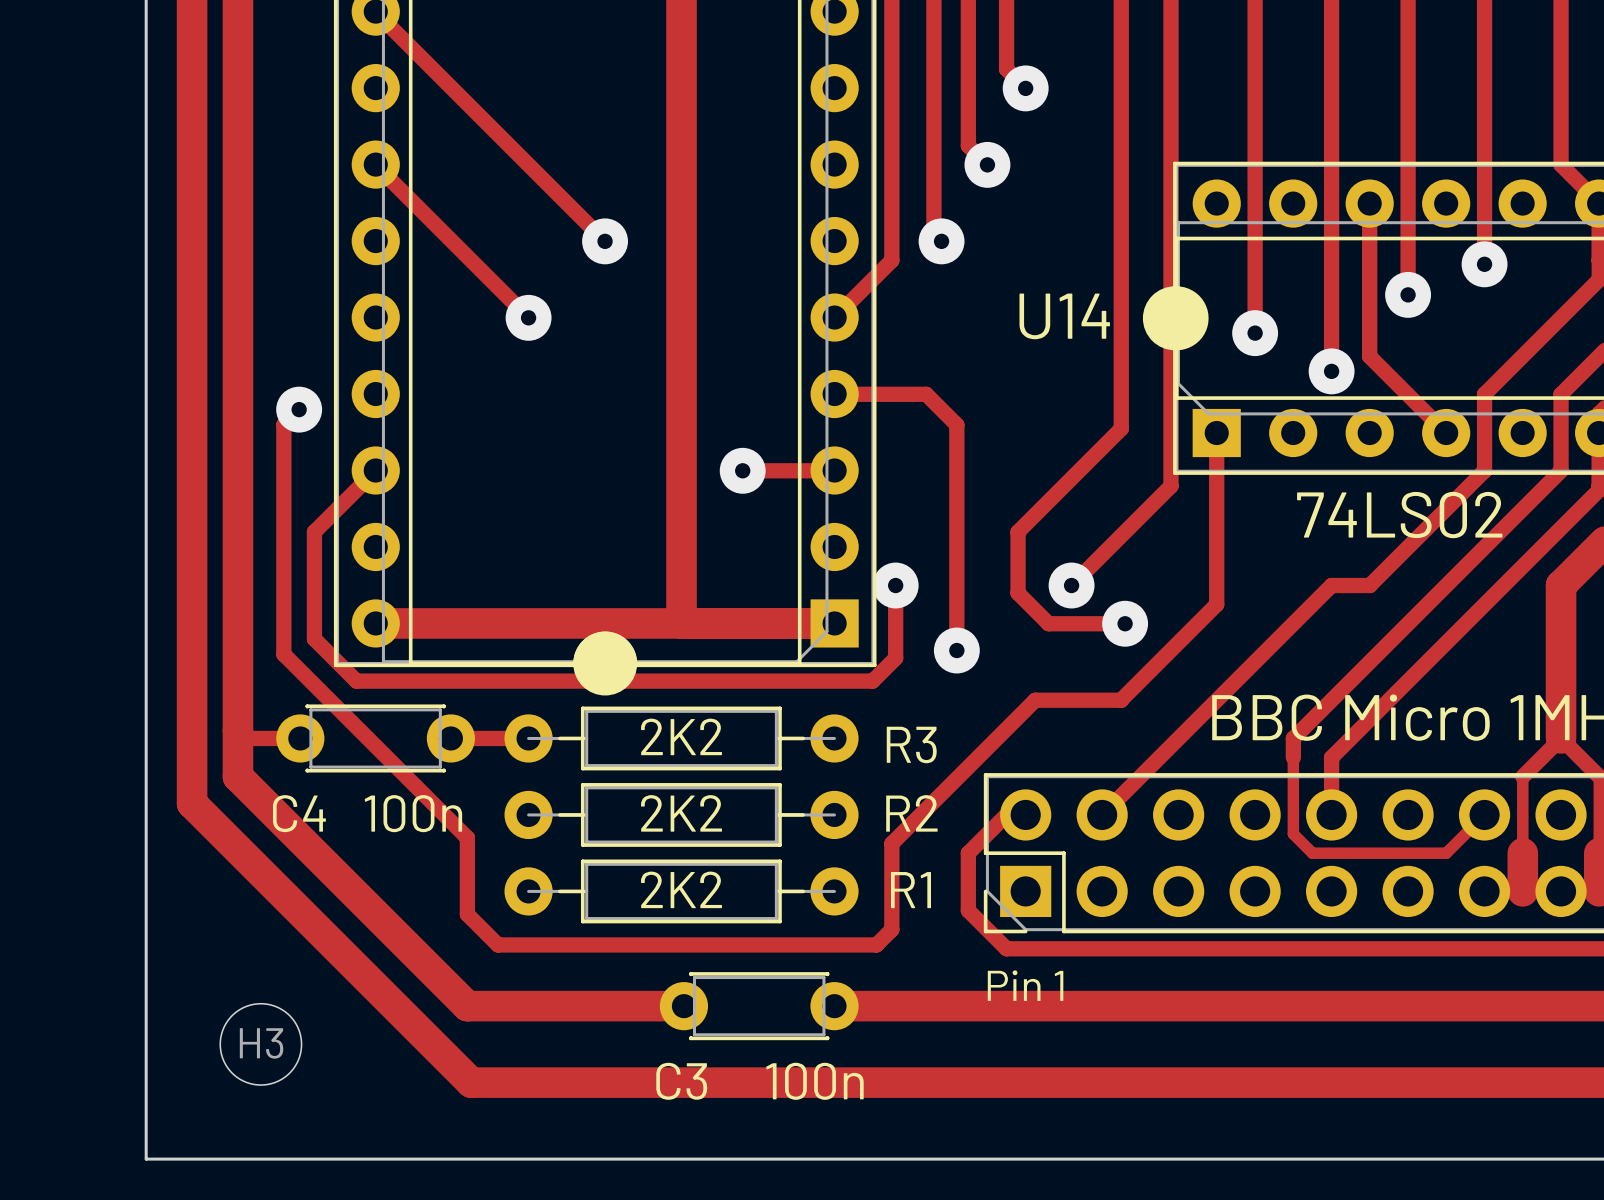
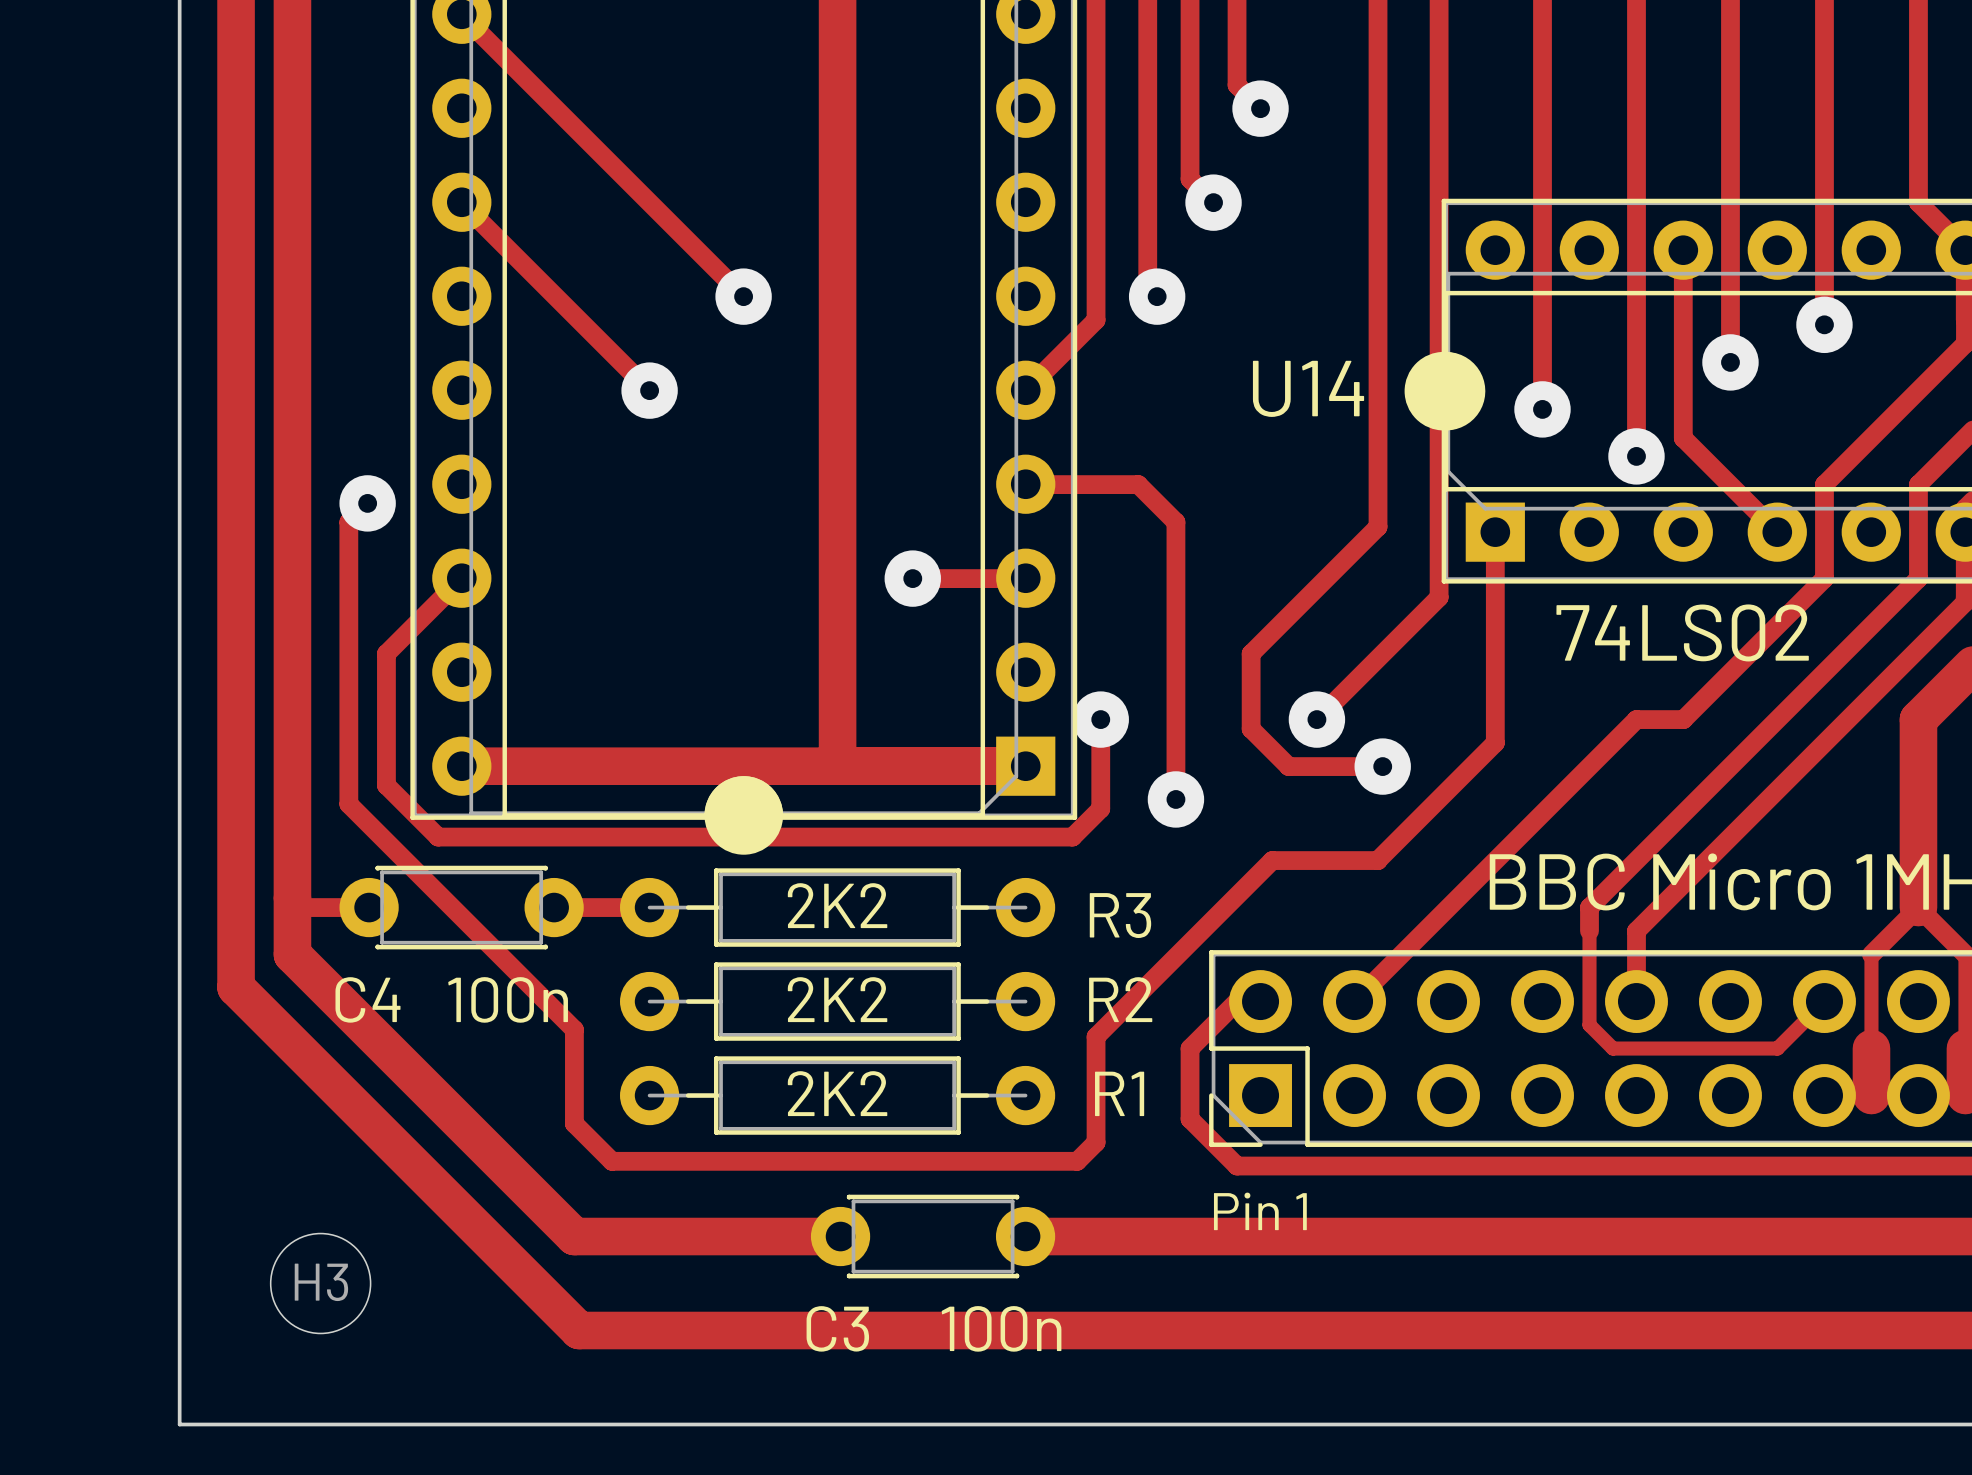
U14 value position: 74LS02 (1399, 515) -> 74LS02 (1682, 632)

